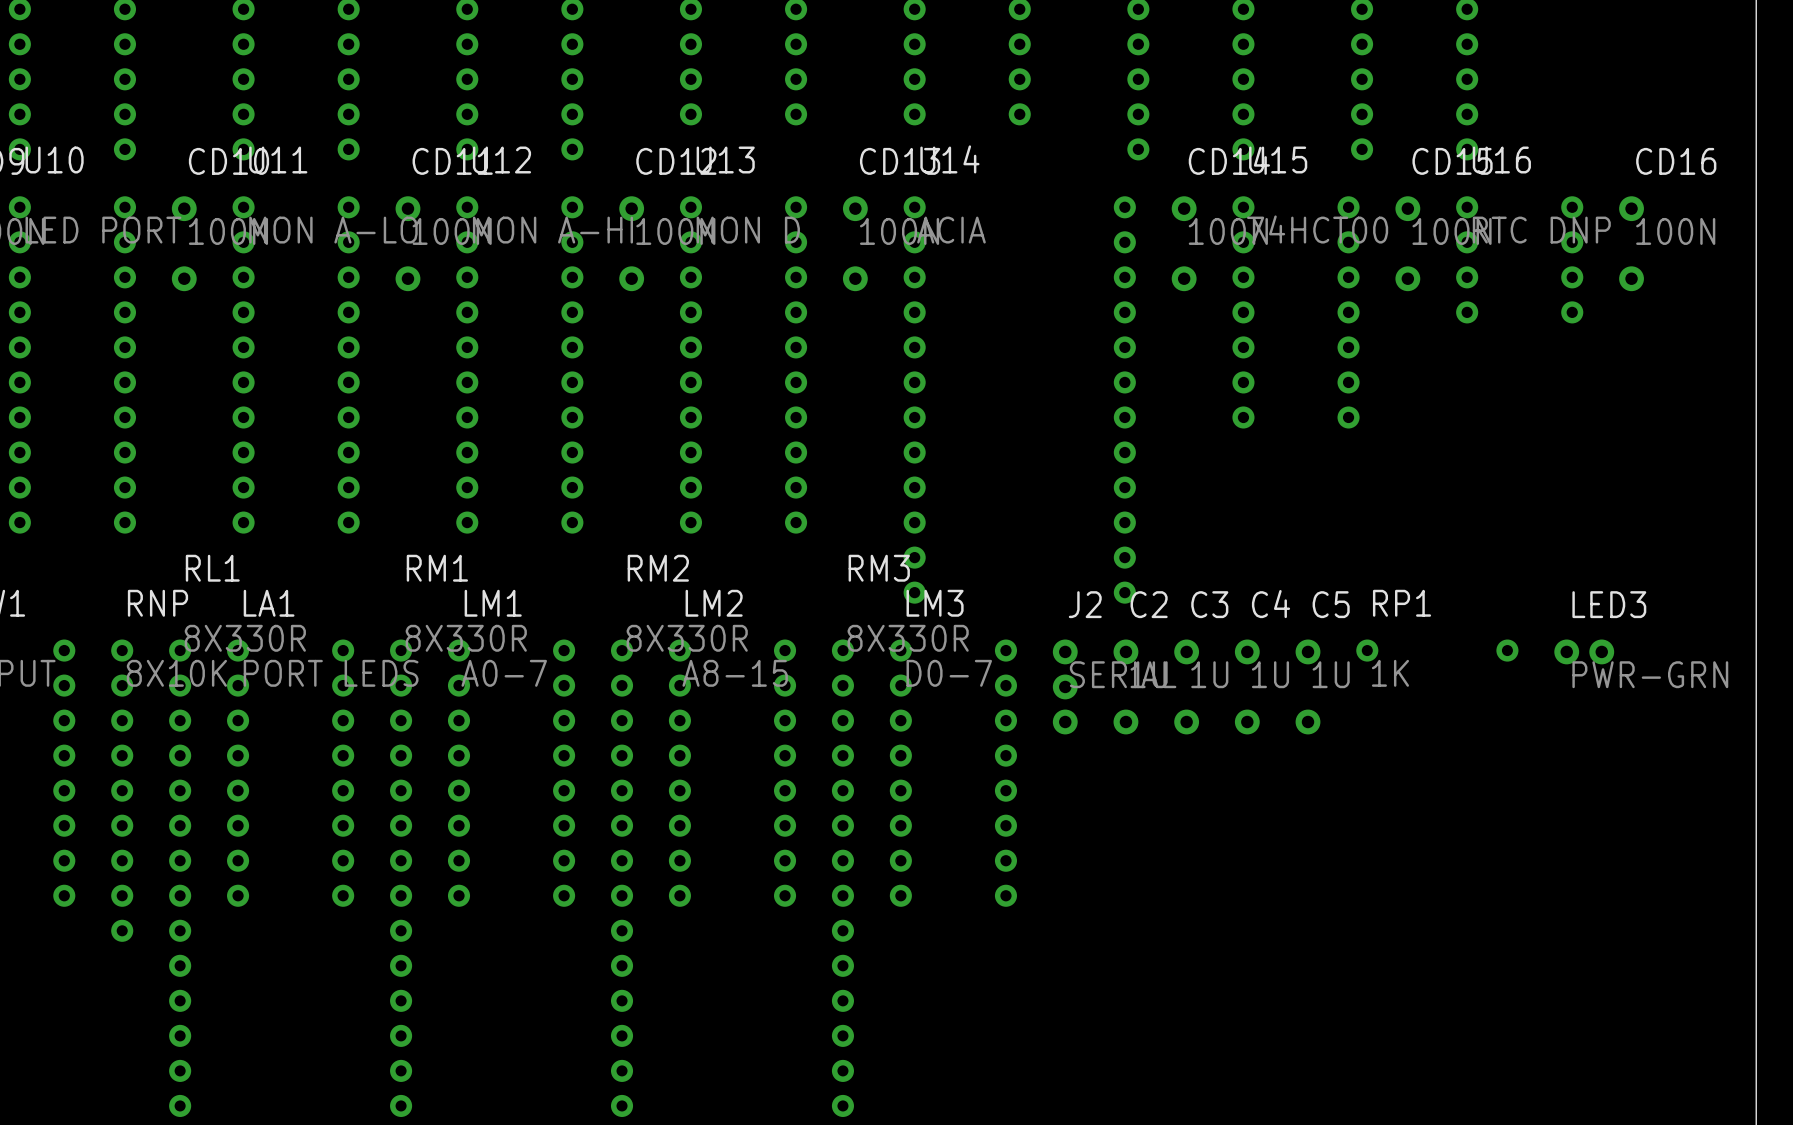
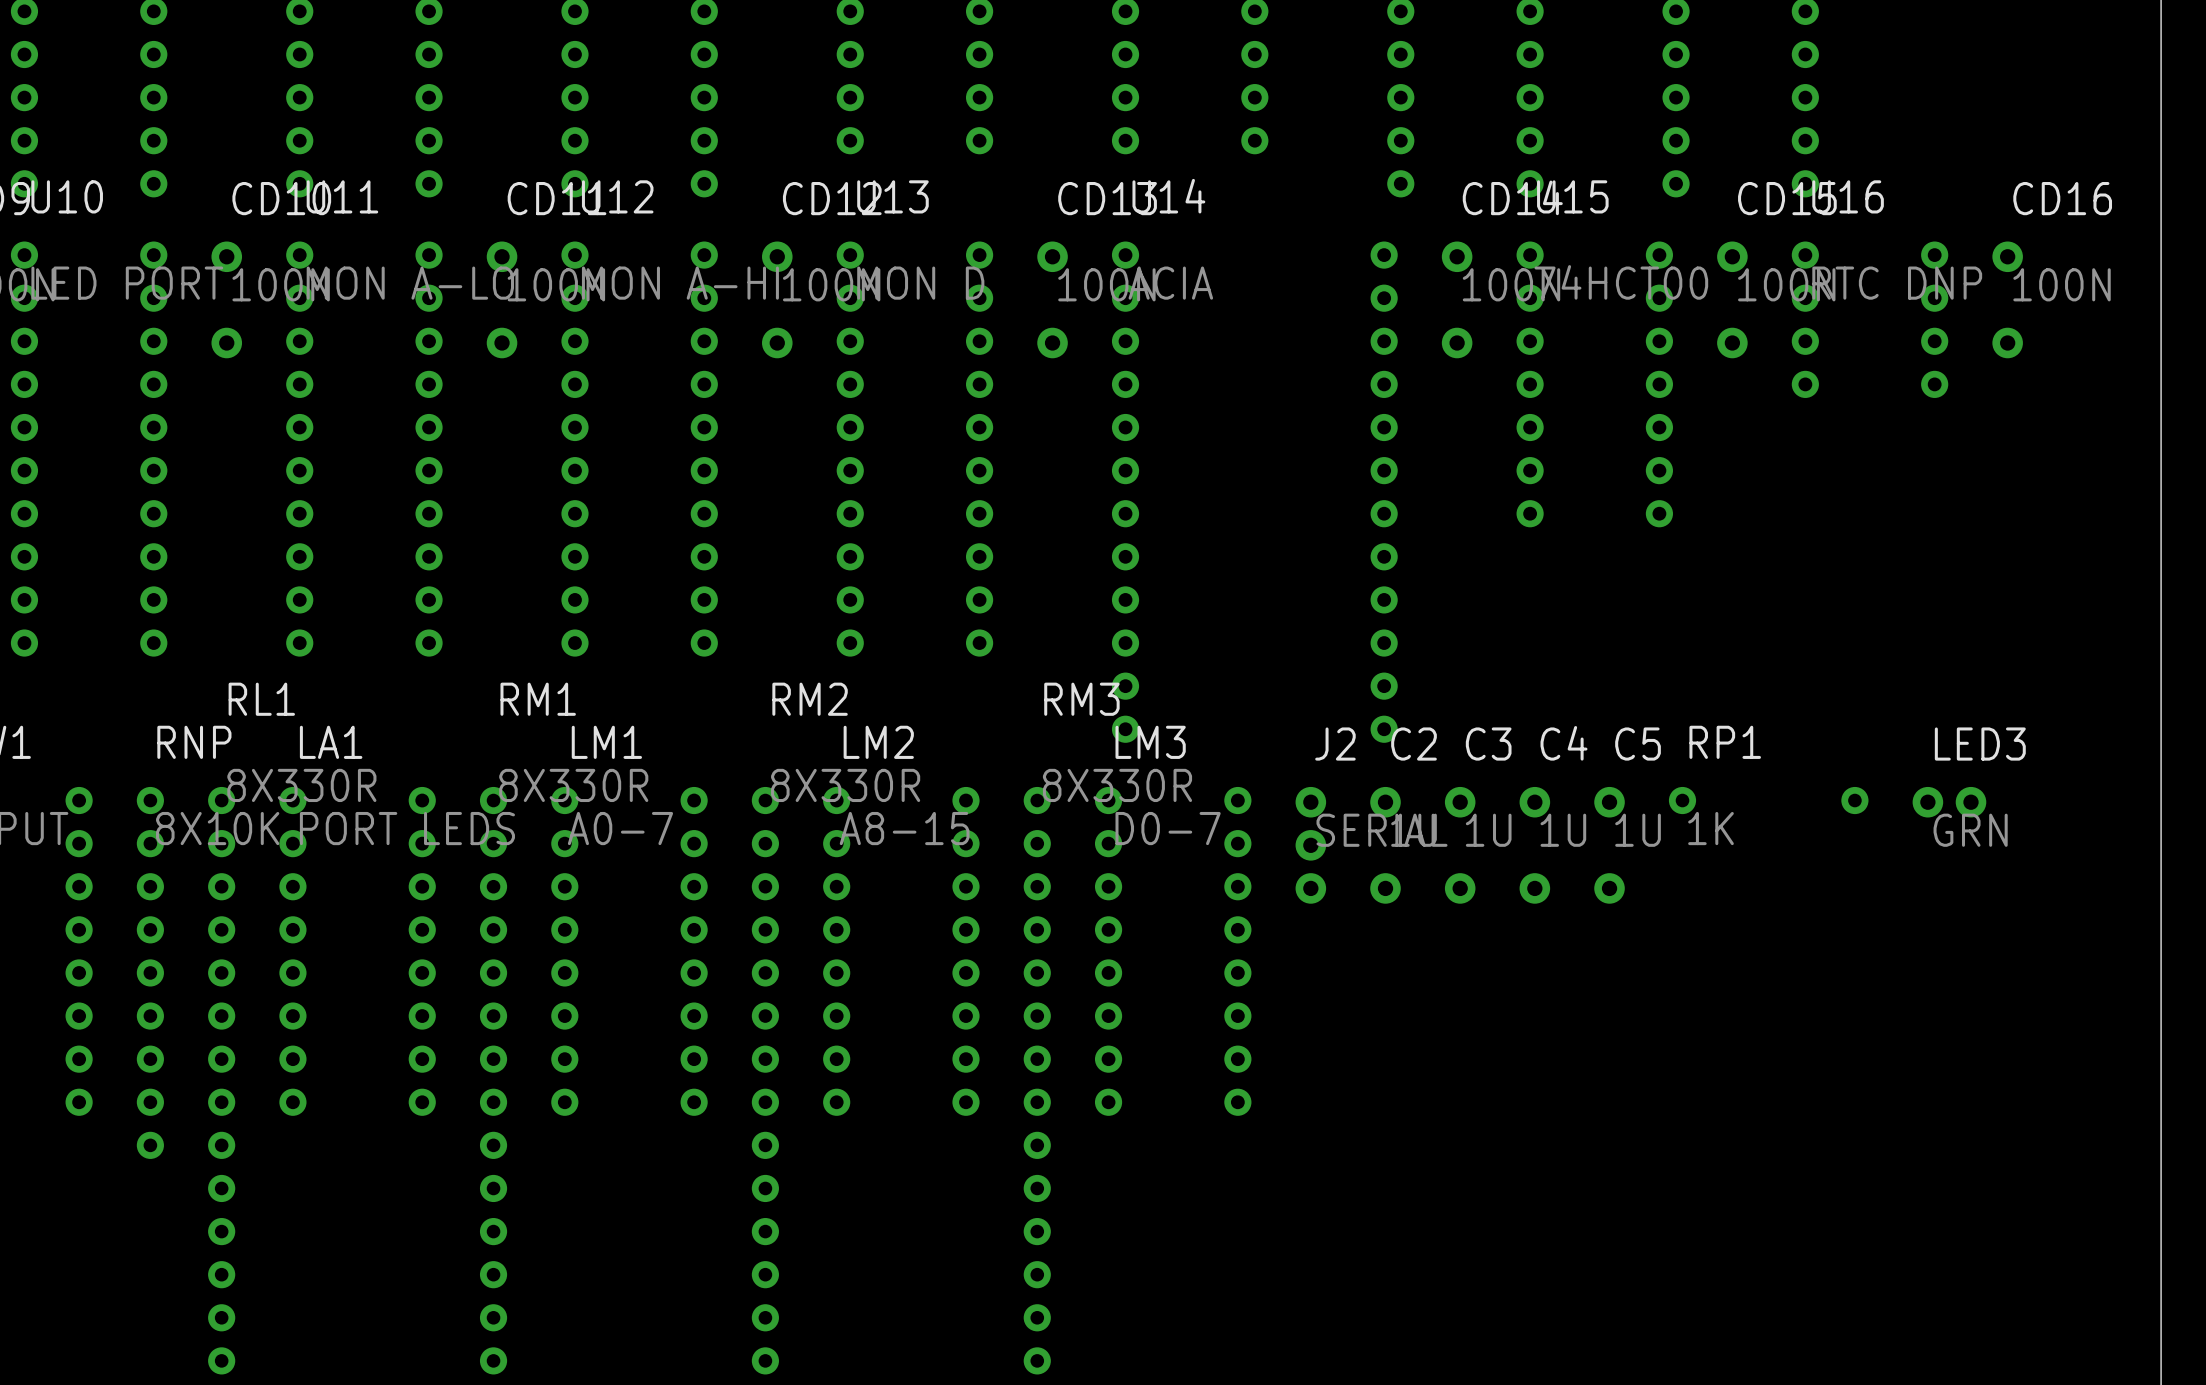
LED3 value: PWR-GRN (1650, 674) -> GRN (1970, 830)

